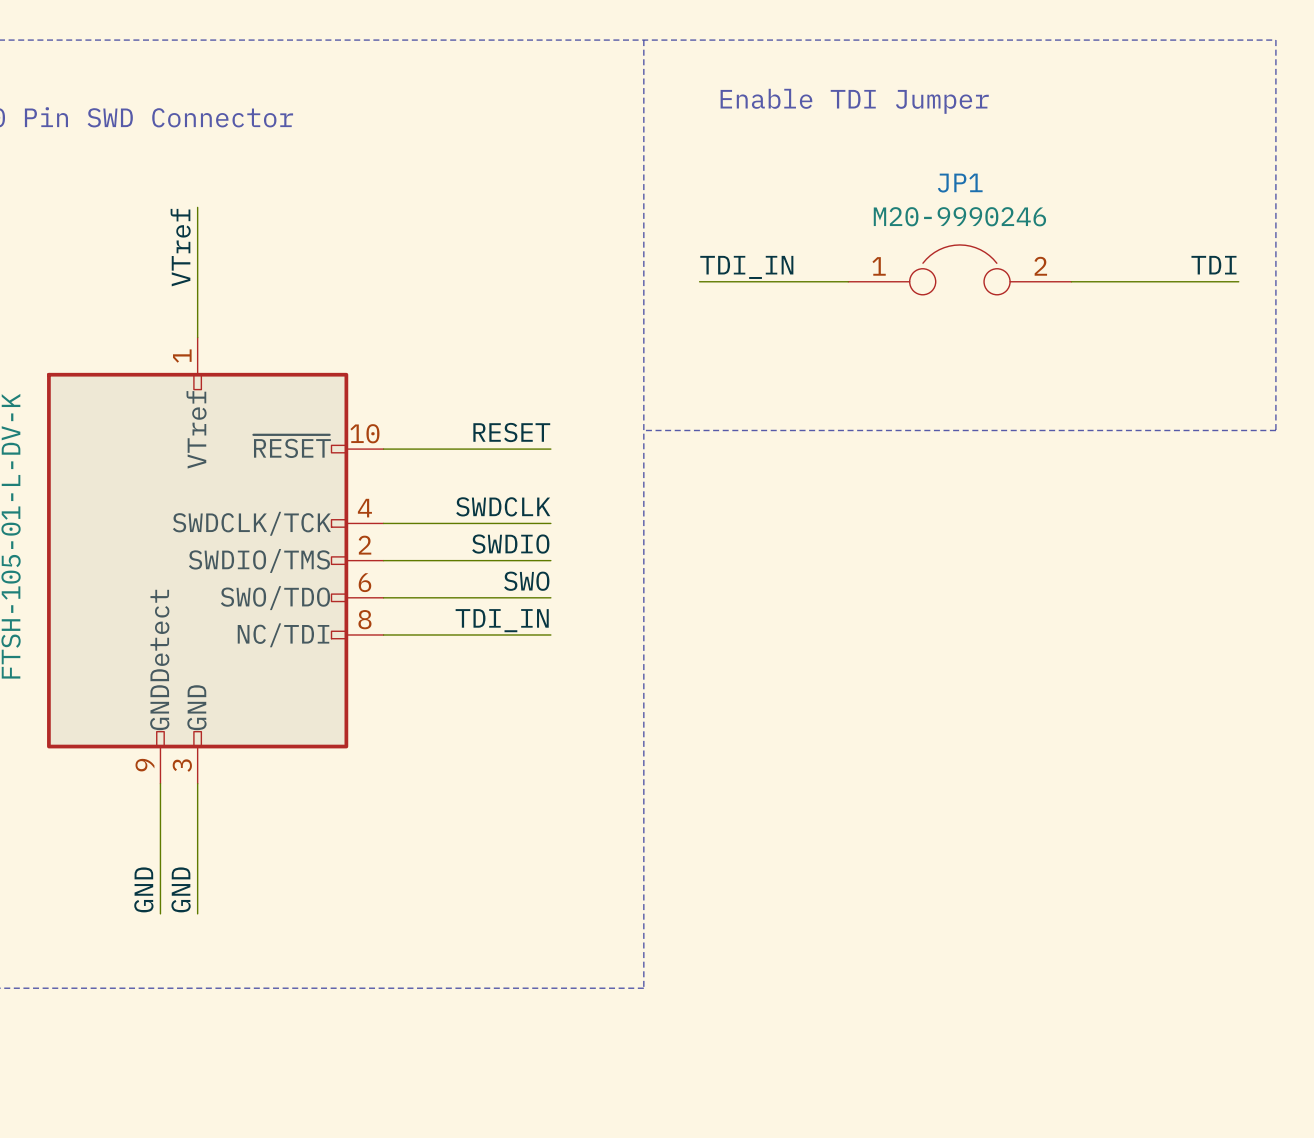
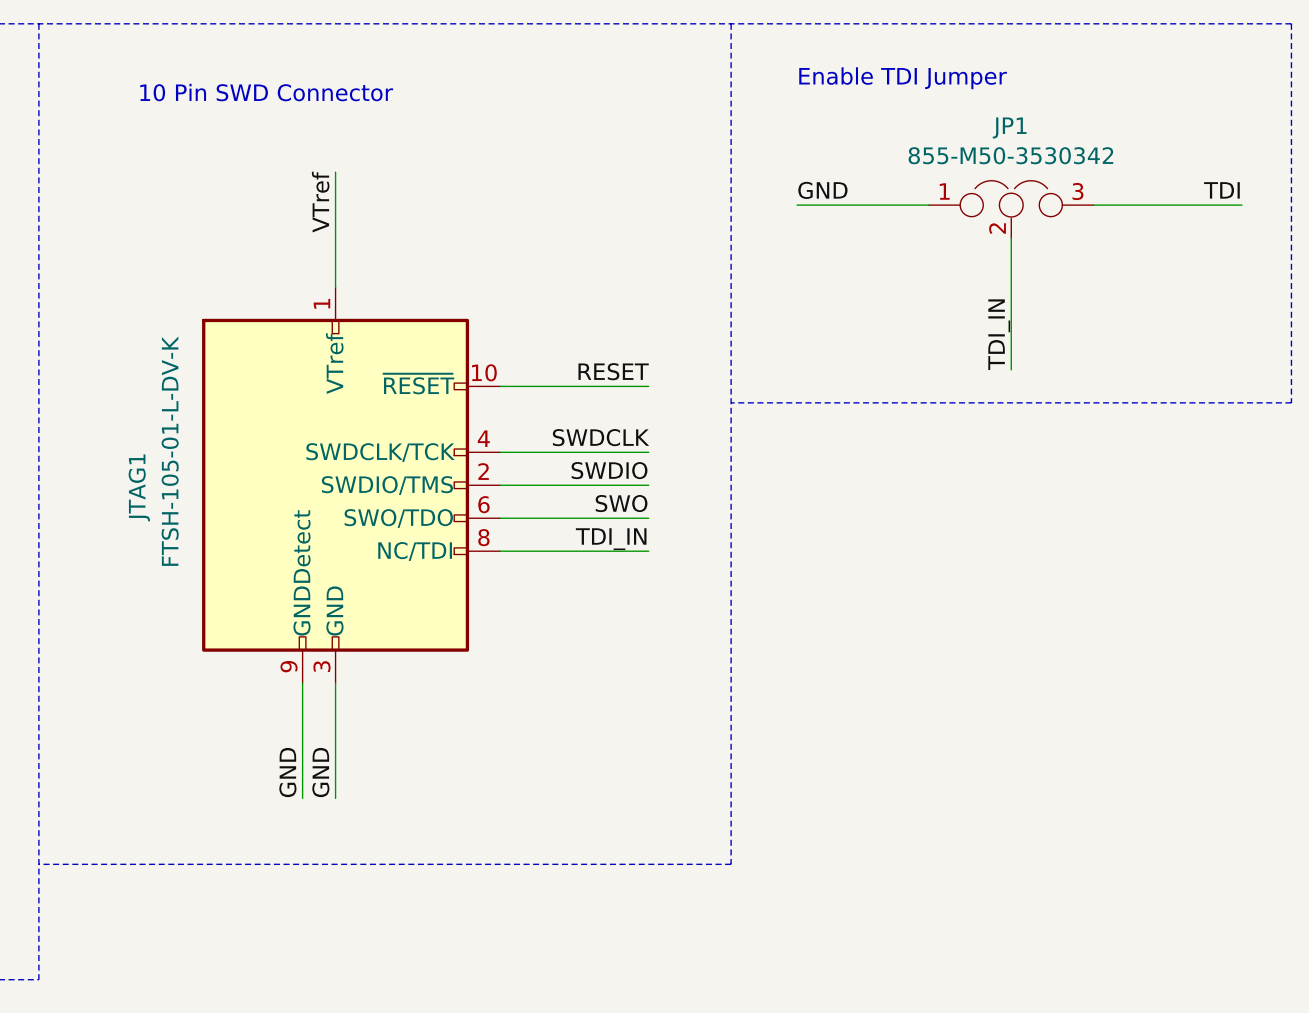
JP1 value: M20-9990246 (959, 216) -> 855-M50-3530342 (1010, 155)
label: none -> GND (822, 190)
JP1 symbol: [848, 244, 1072, 295] -> [928, 180, 1094, 239]
label position: TDI (1213, 265) -> TDI (1221, 190)
label rotation: 0° (746, 267) -> 90° counterclockwise (999, 334)
label position: TDI_IN (746, 267) -> TDI_IN (999, 334)
wire: (699, 281) (848, 281) -> (797, 205) (928, 205)
wire: none -> (1011, 238) (1011, 369)
wire: (1071, 281) (1238, 281) -> (1093, 205) (1242, 205)
line: (643, 430) (1275, 430) -> (731, 402) (1291, 402) (1291, 369)

